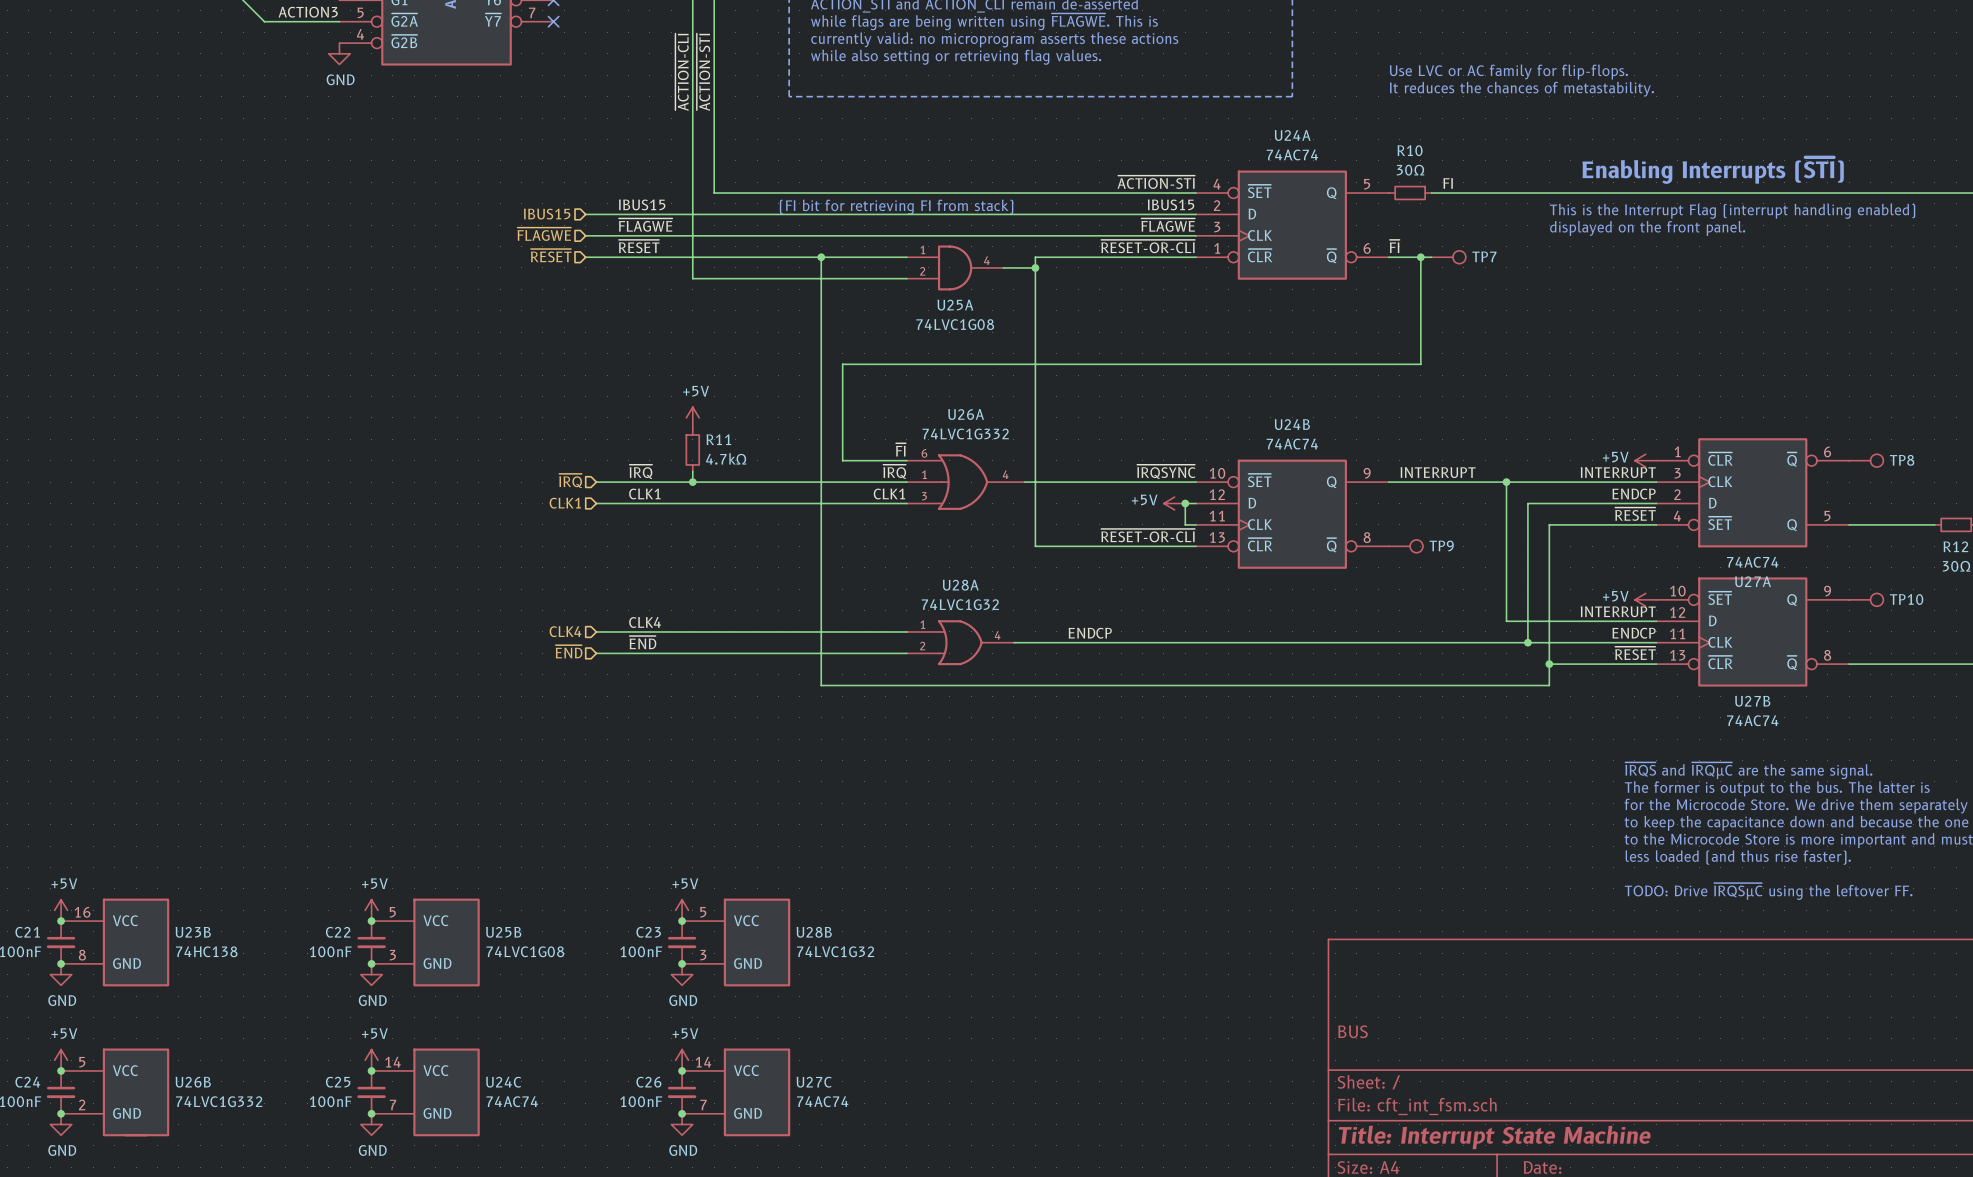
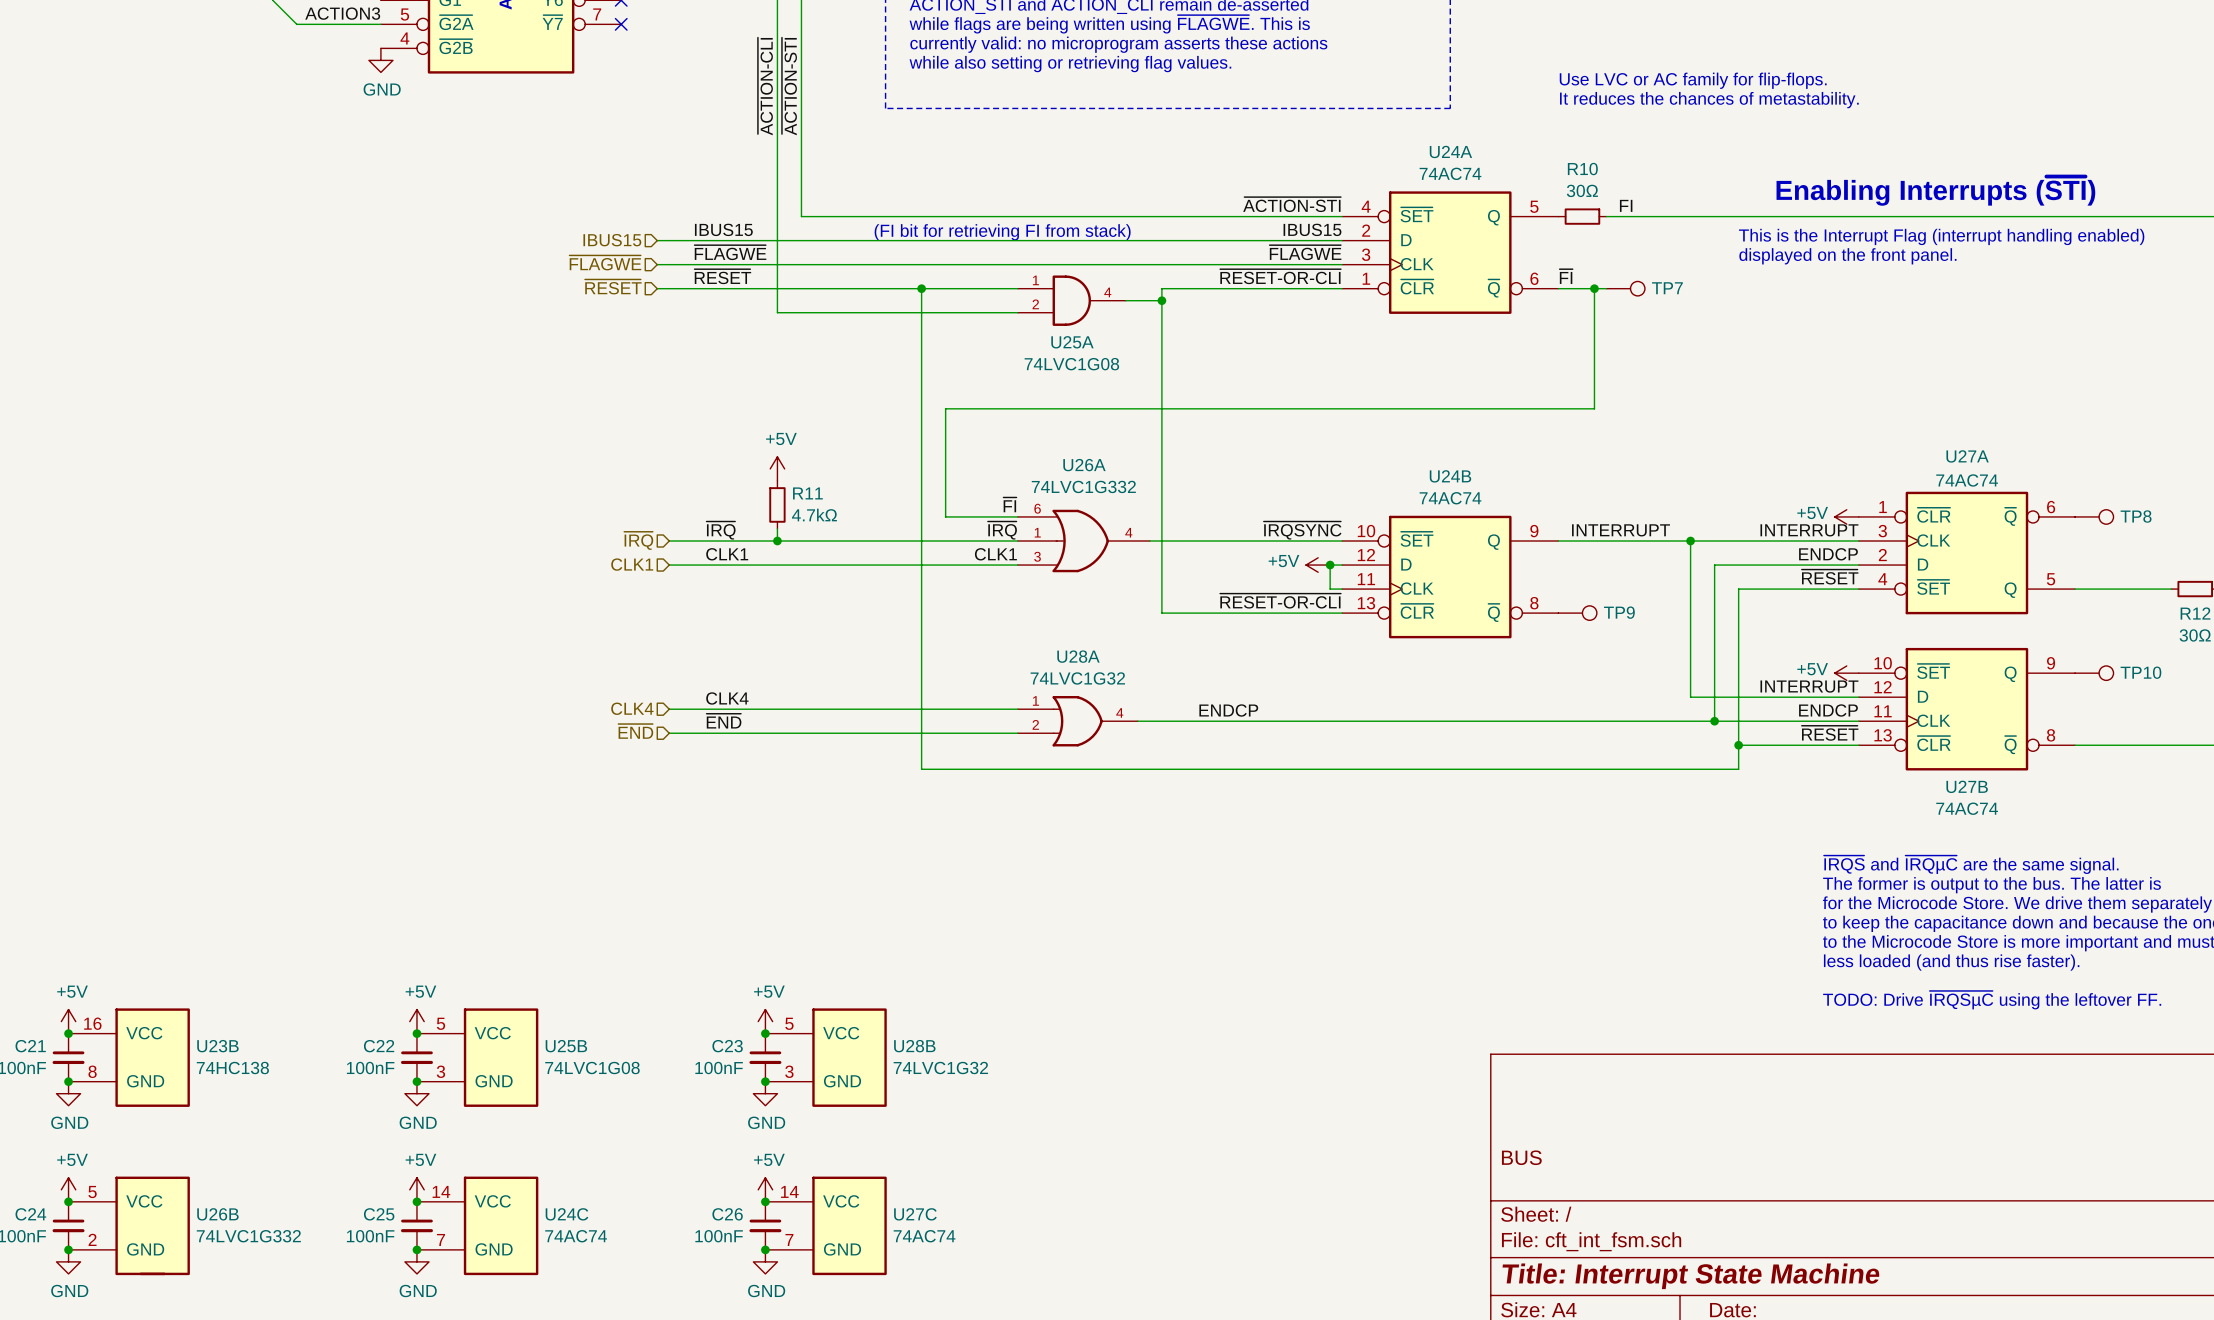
U27A value position: 74AC74 (1752, 562) -> 74AC74 (1967, 480)
U27A name position: U27A (1753, 581) -> U27A (1967, 456)

